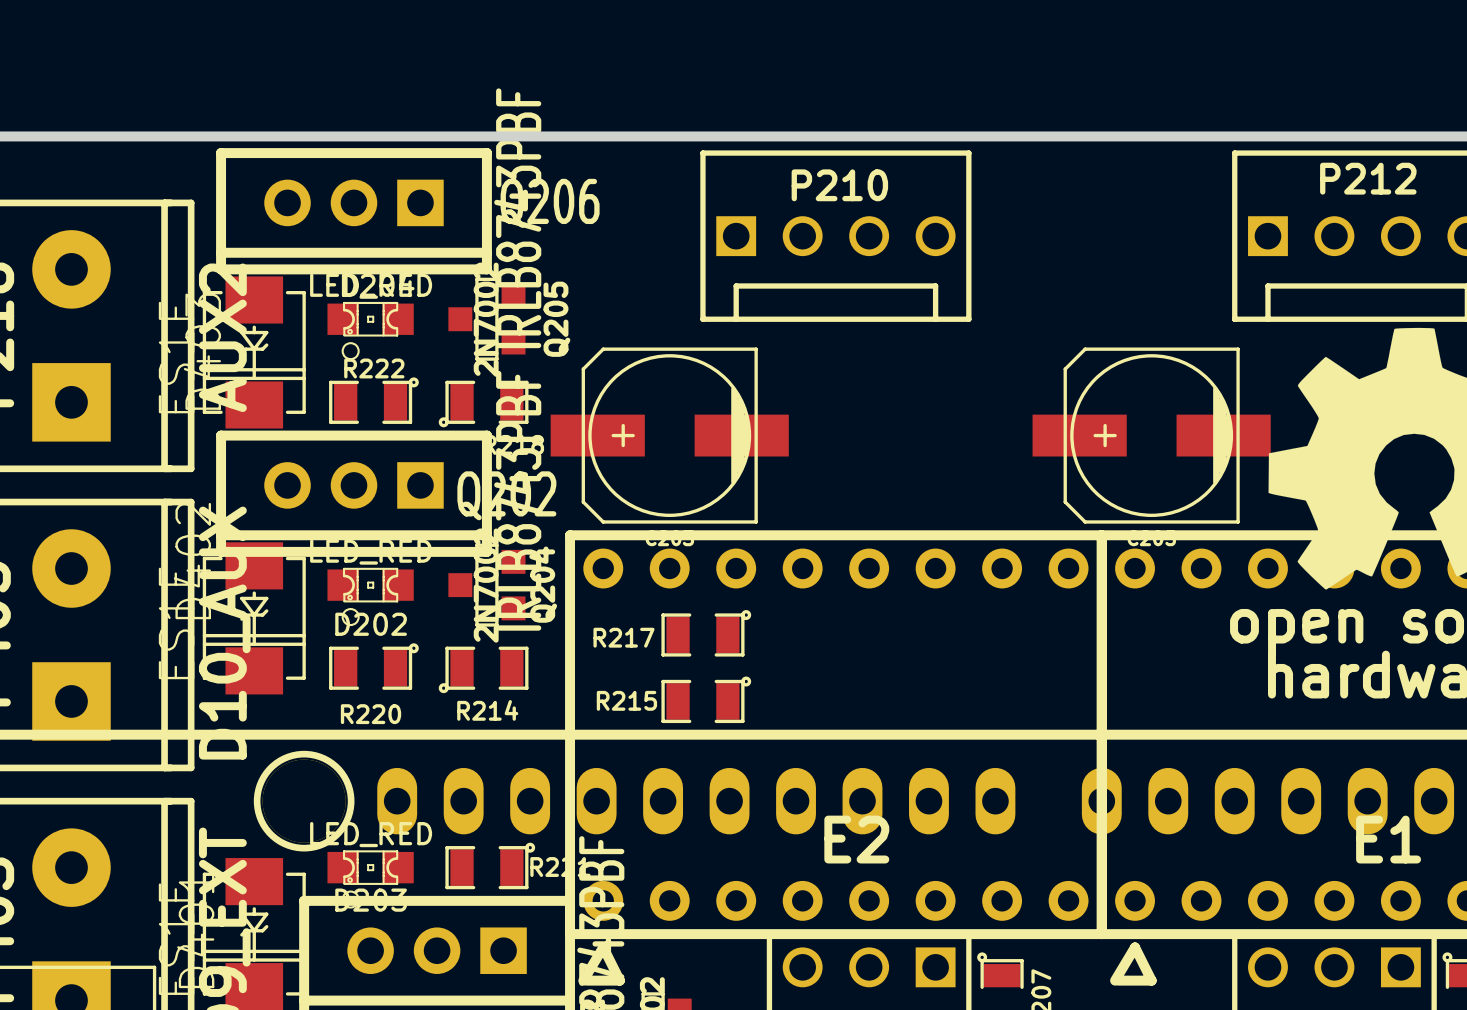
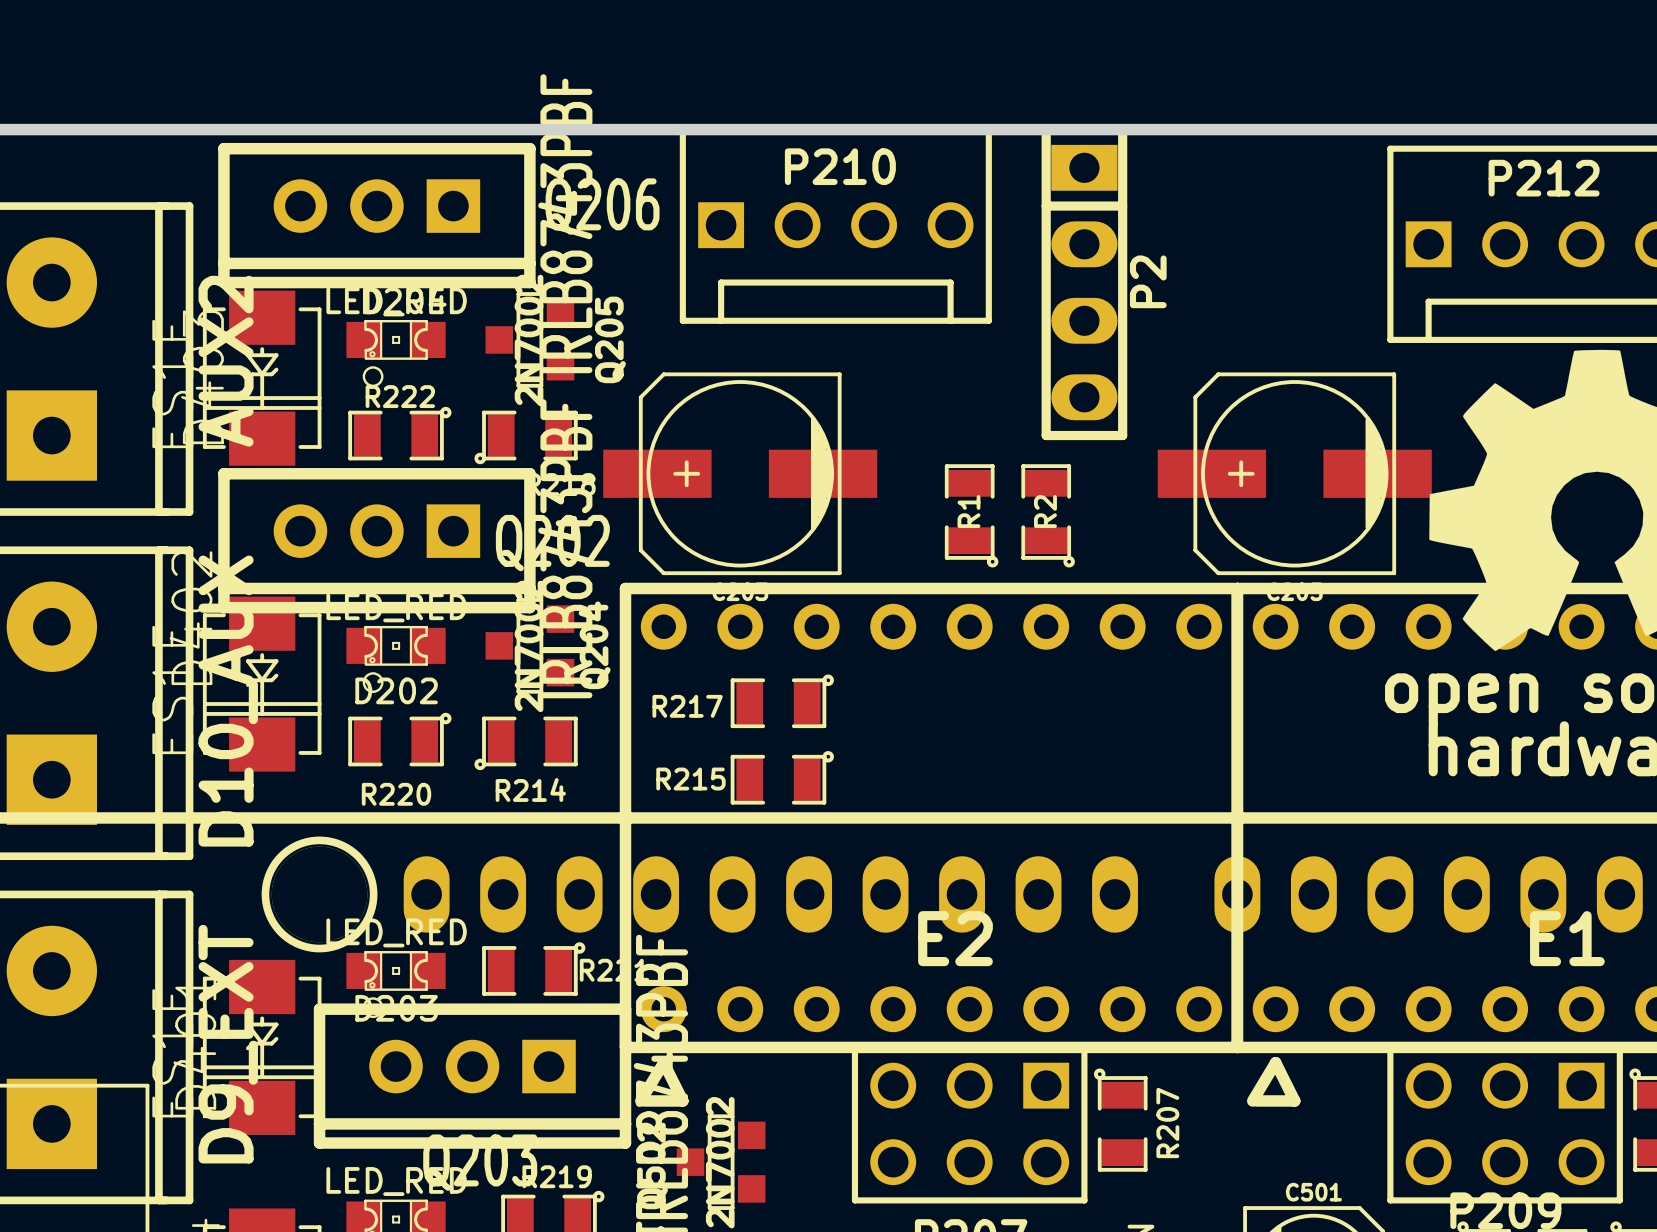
P210 position: (835, 236) -> (835, 225)
P2: none -> (1084, 282)
R1: none -> (971, 515)
R2: none -> (1048, 515)

